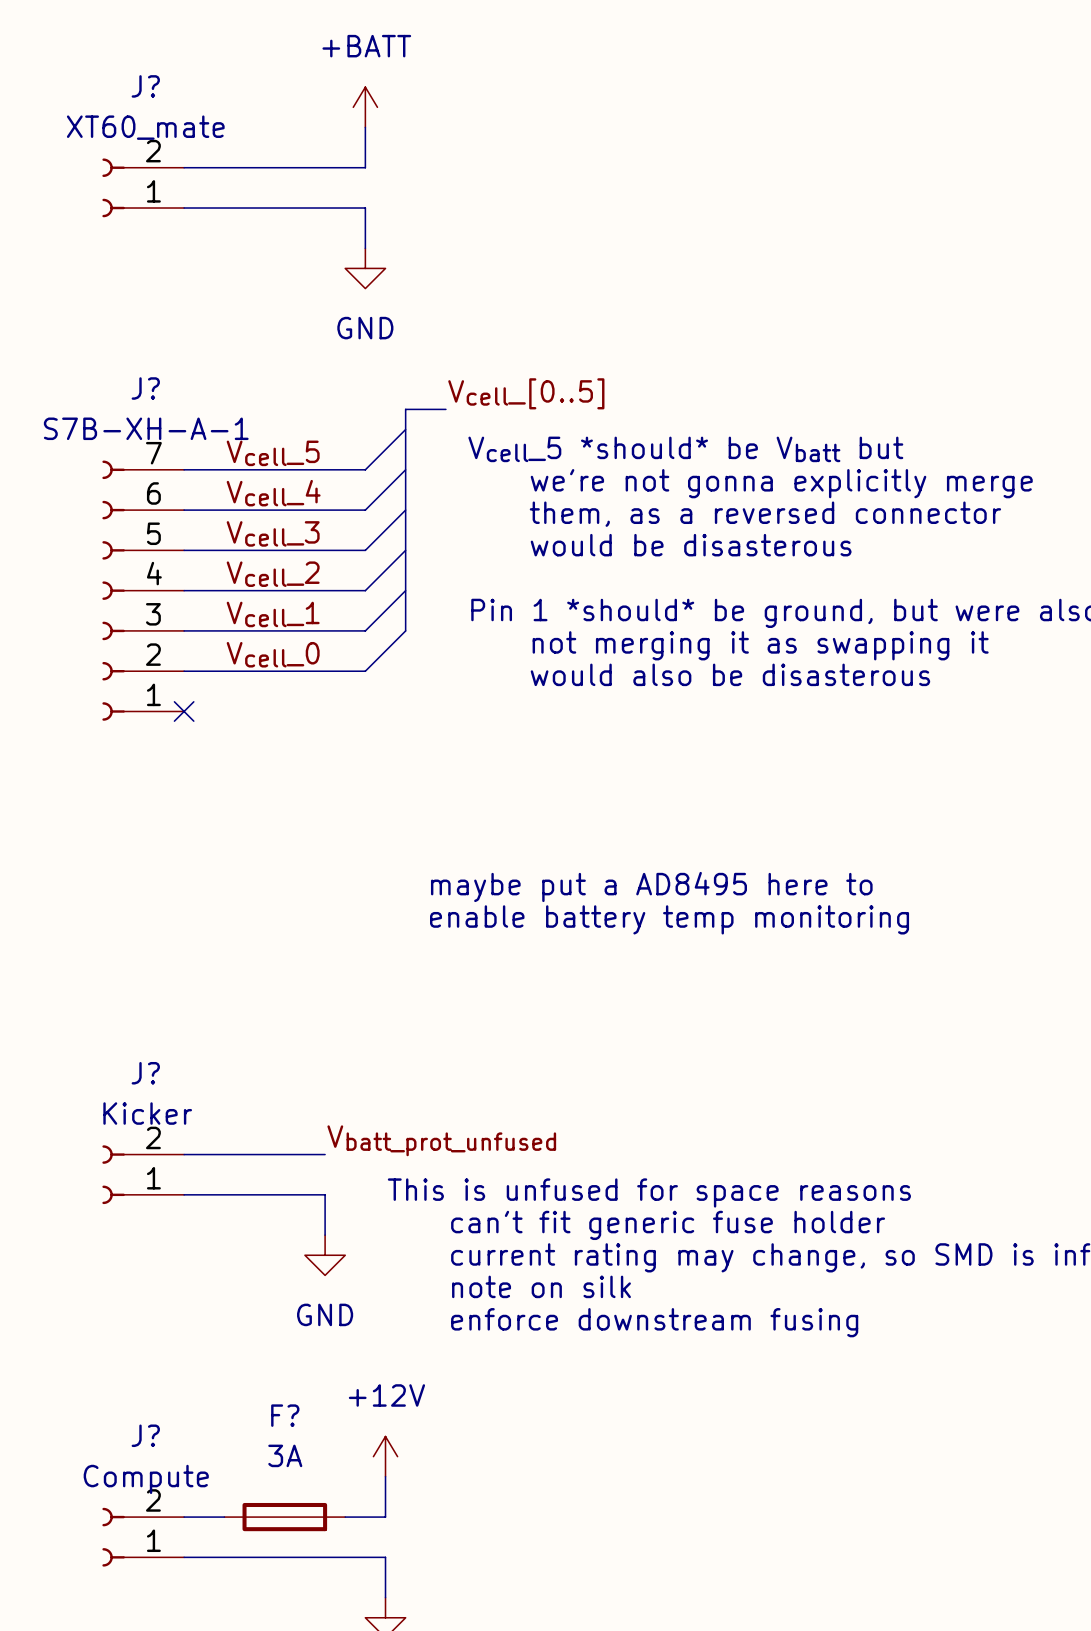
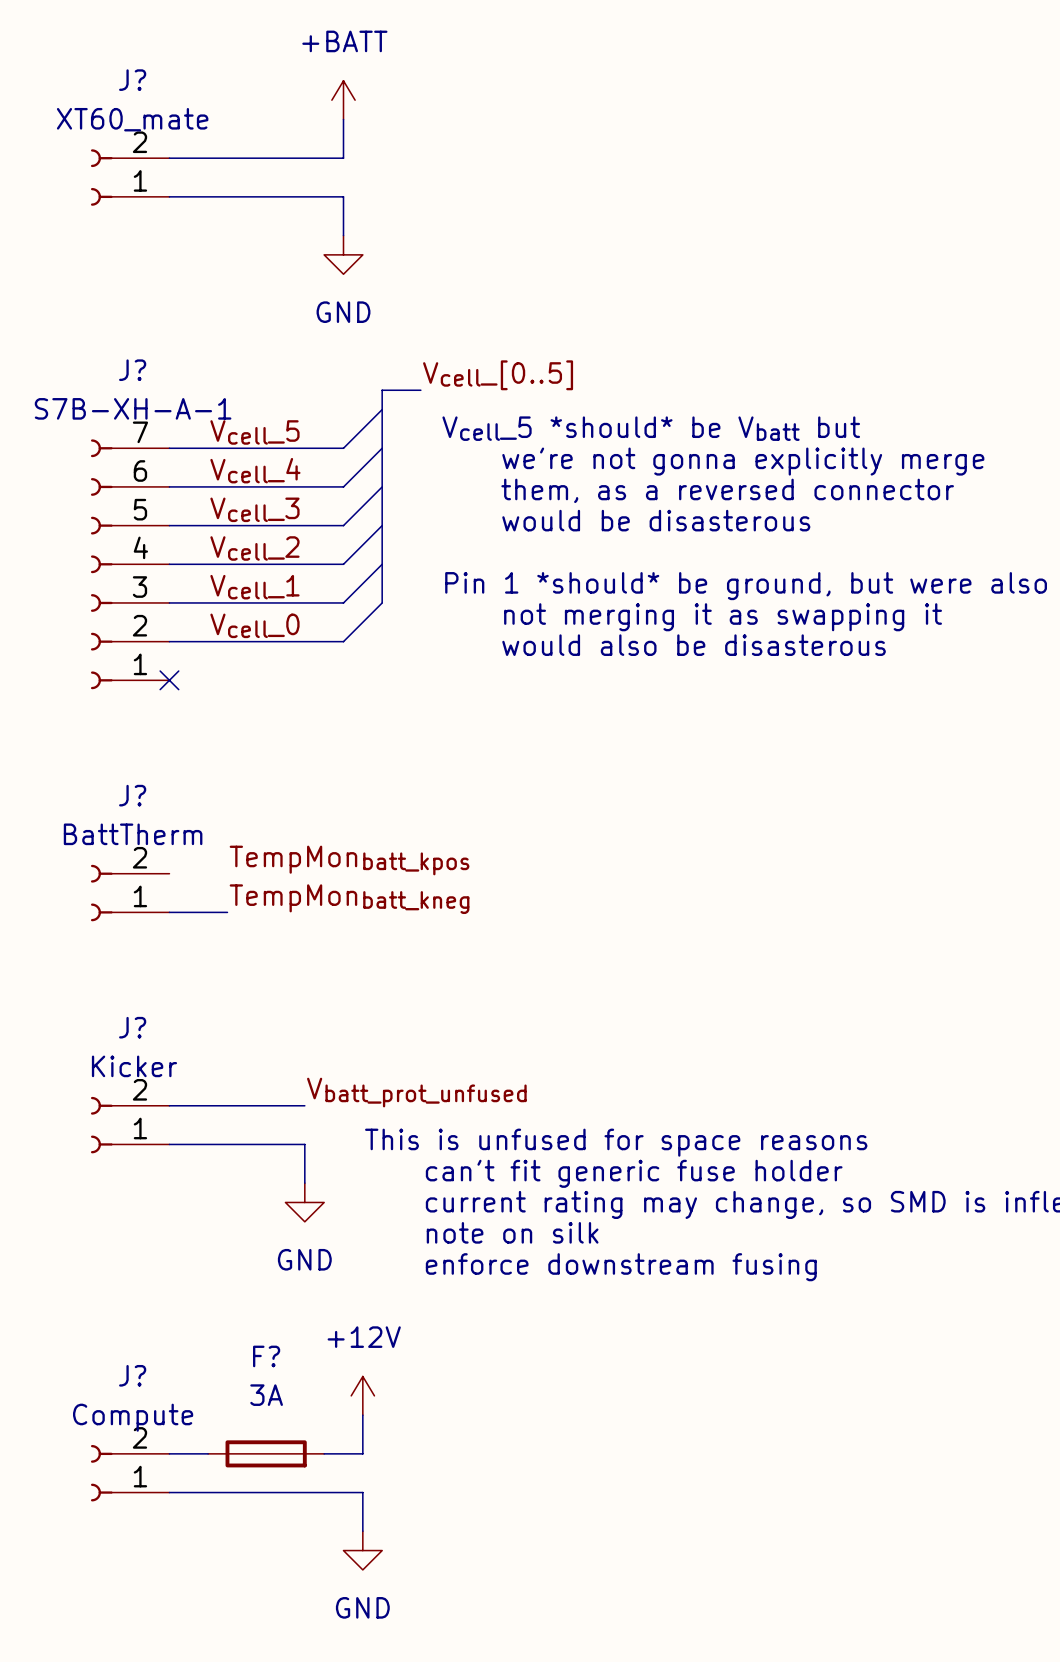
text: maybe put a AD8495 here to (651, 886) -> none
label: none -> TempMonbatt_kpos (349, 860)
text: enable battery temp monitoring (669, 919) -> none
J?: none -> BattTherm (130, 893)
label: none -> TempMonbatt_kneg (349, 899)
wire: none -> (169, 912) (227, 912)

